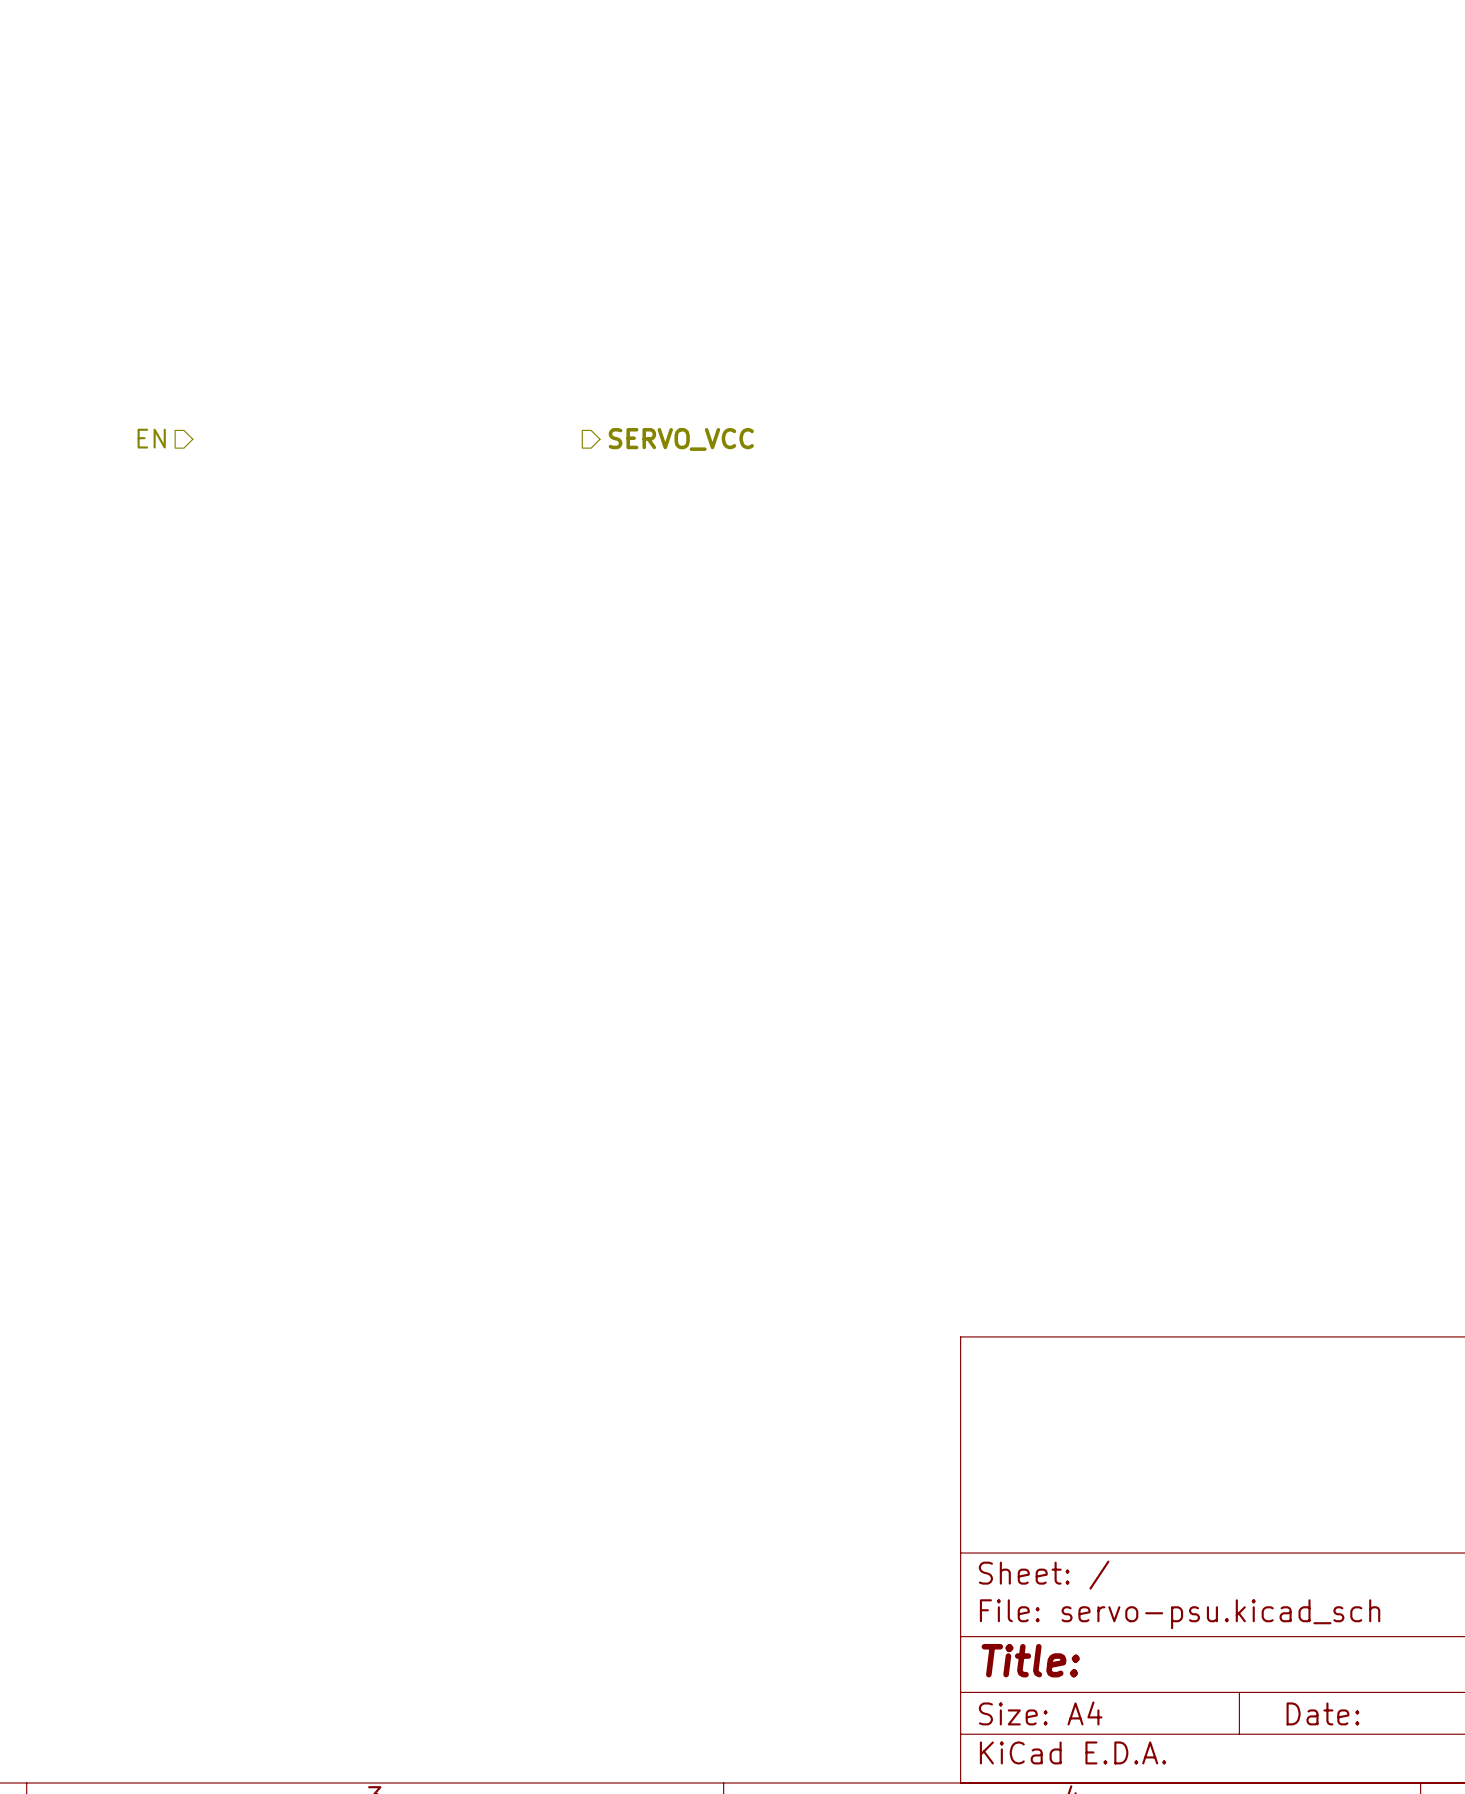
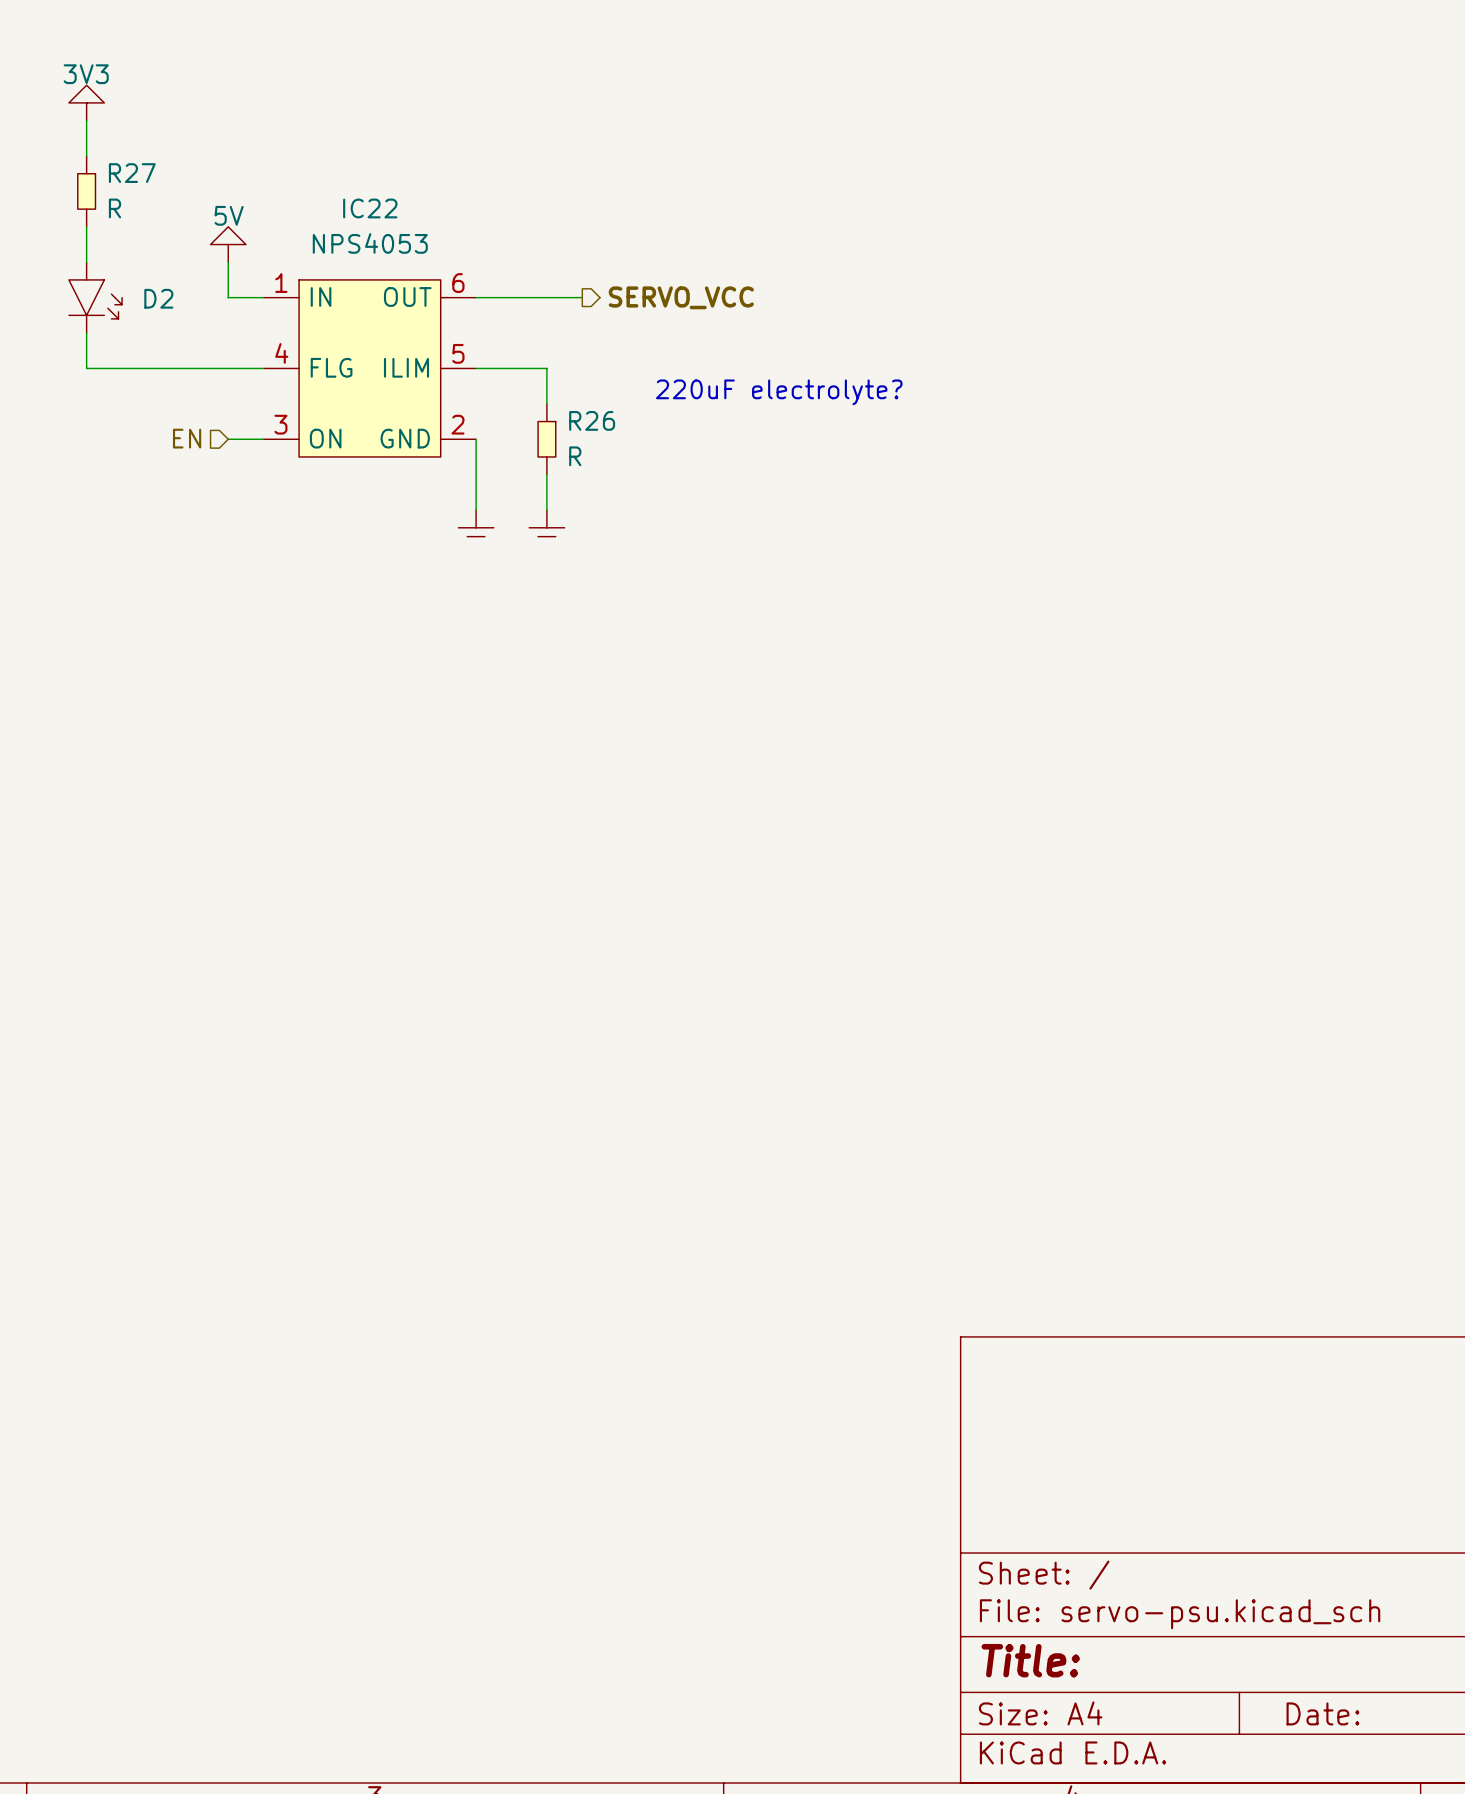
power symbol: none -> 3V3 (86, 102)
wire: none -> (86, 120) (86, 156)
R27: none -> R (86, 191)
wire: none -> (86, 226) (86, 262)
power symbol: none -> 5V (228, 244)
wire: none -> (228, 262) (228, 297) (263, 297)
D2: none -> (95, 297)
wire: none -> (476, 297) (582, 297)
wire: none -> (86, 333) (86, 368) (263, 368)
IC22: none -> NPS4053 (369, 368)
wire: none -> (476, 368) (546, 368) (546, 403)
text: none -> 220uF electrolyte? (779, 392)
hierarchical label position: EN (151, 438) -> EN (187, 438)
wire: none -> (228, 439) (263, 439)
wire: none -> (476, 439) (476, 510)
R26: none -> R (546, 439)
hierarchical label position: SERVO_VCC (681, 439) -> SERVO_VCC (681, 297)
wire: none -> (546, 474) (546, 510)
power symbol: none -> (476, 527)
power symbol: none -> (546, 527)

